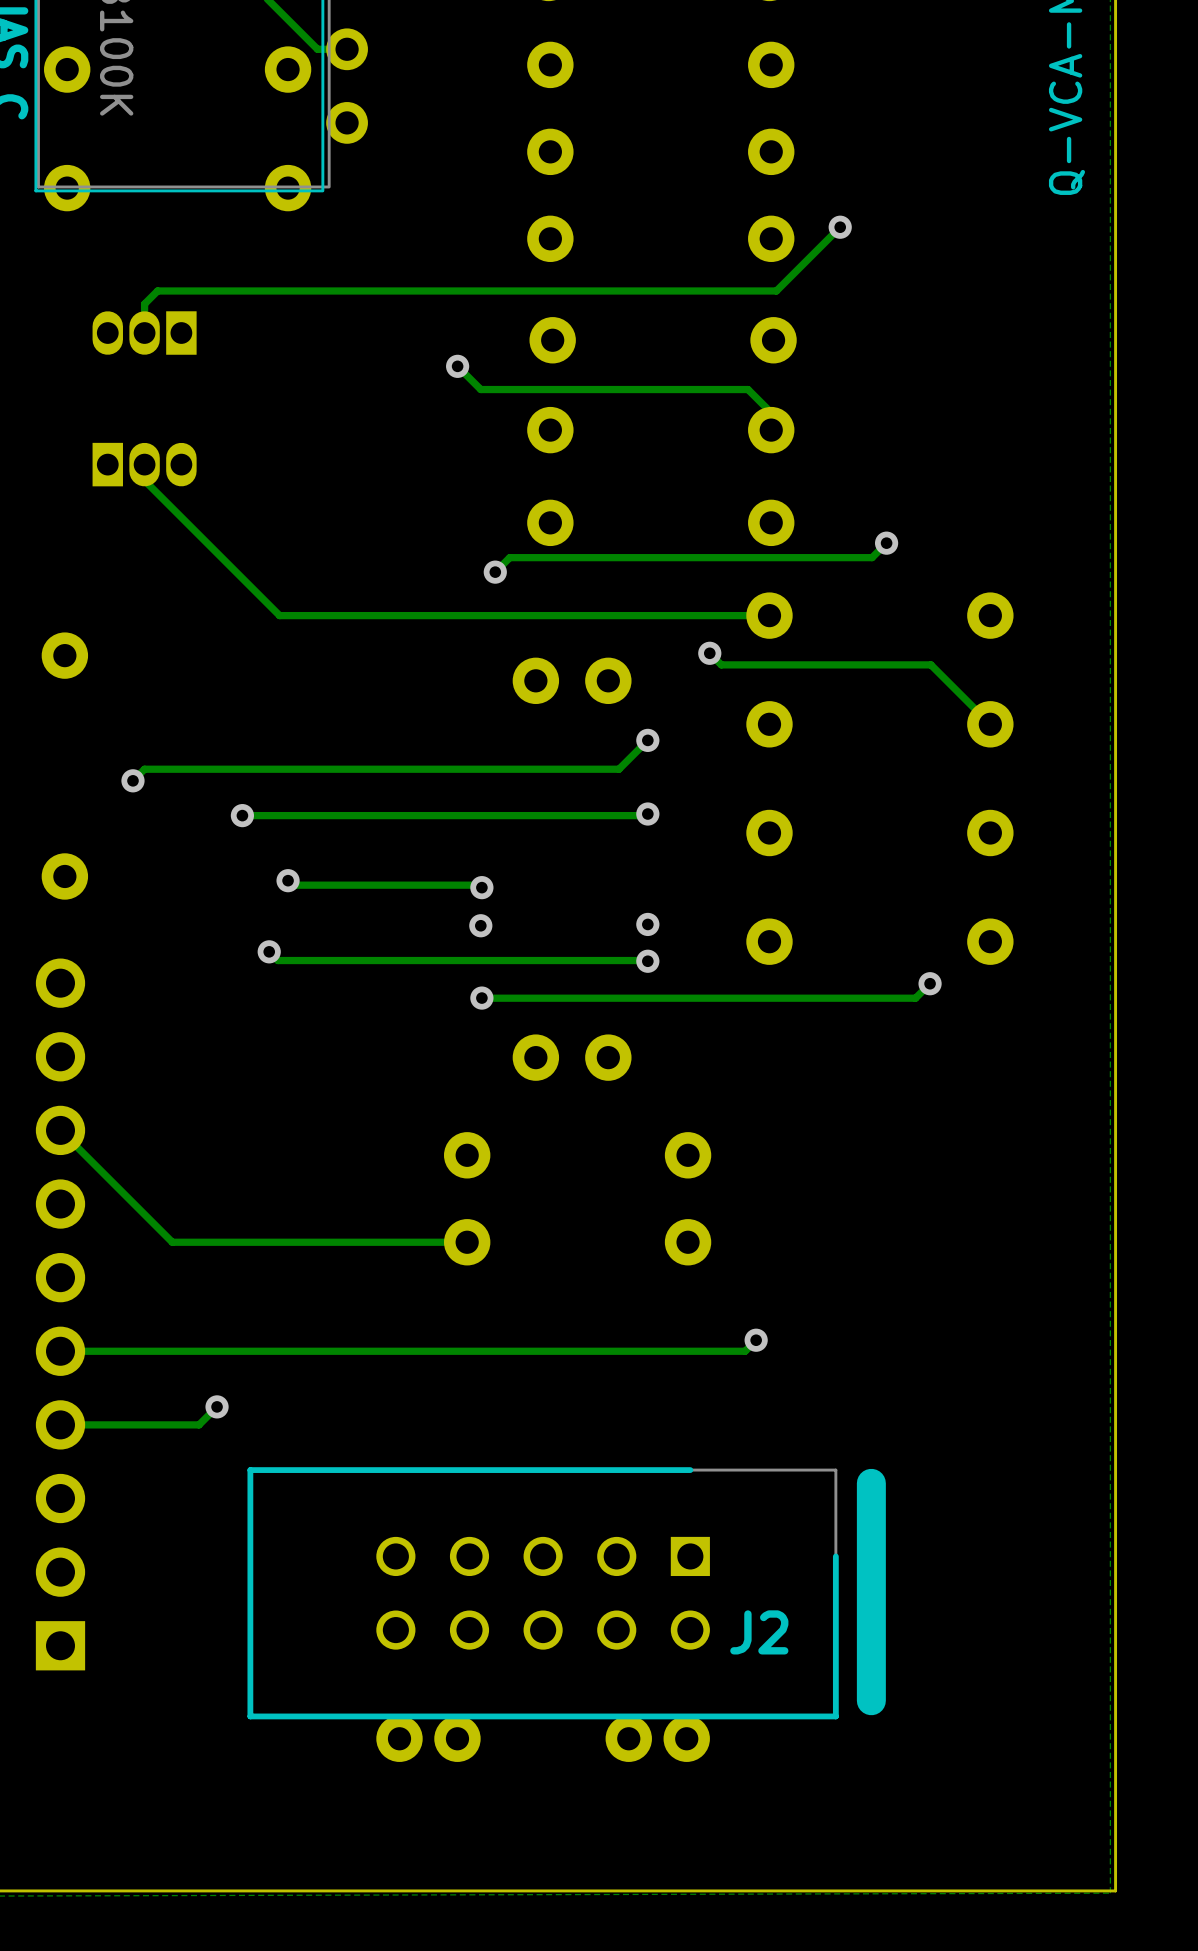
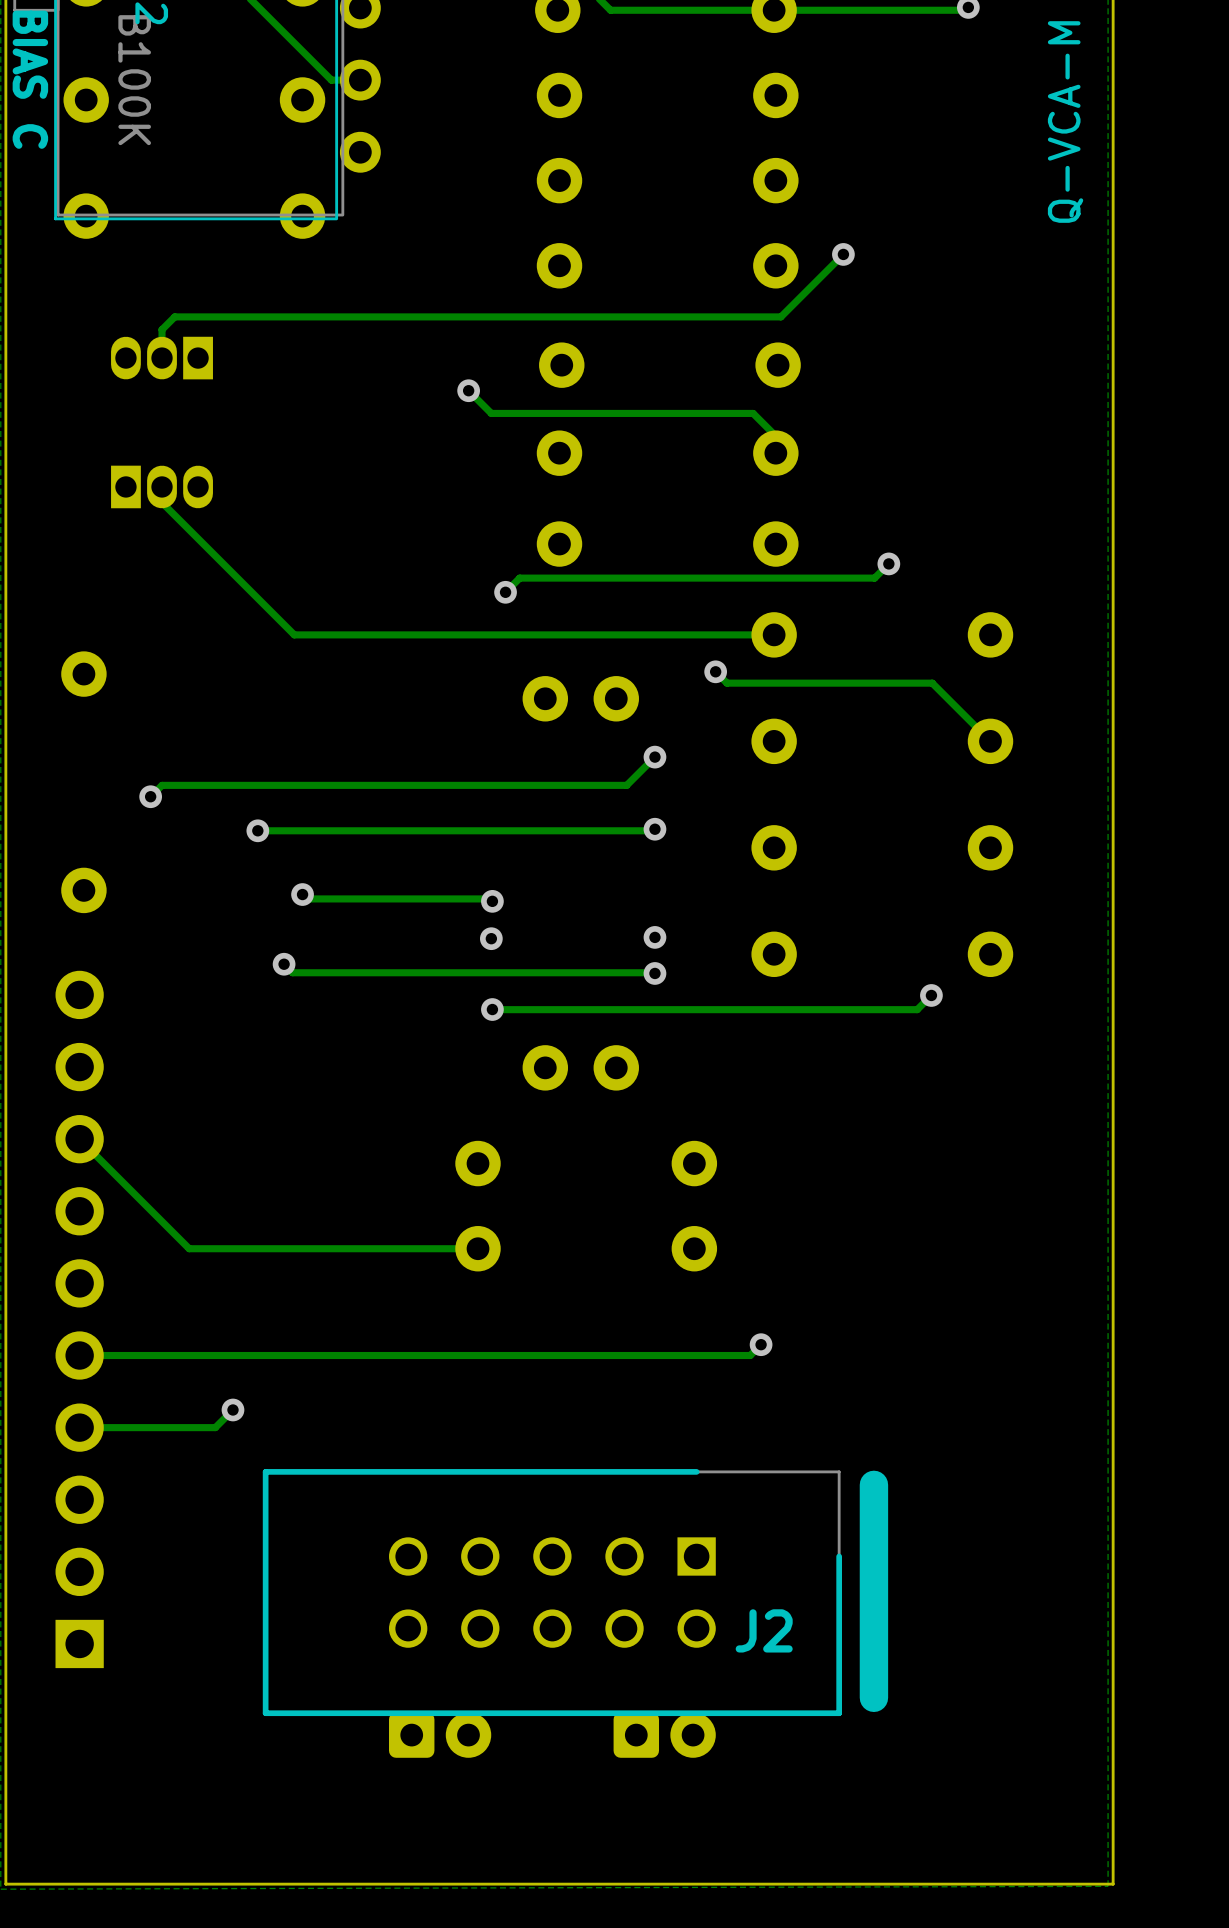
part footprint: [376, 1715, 481, 1762] -> [389, 1712, 492, 1758]
part footprint: [605, 1715, 710, 1762] -> [613, 1712, 716, 1758]

